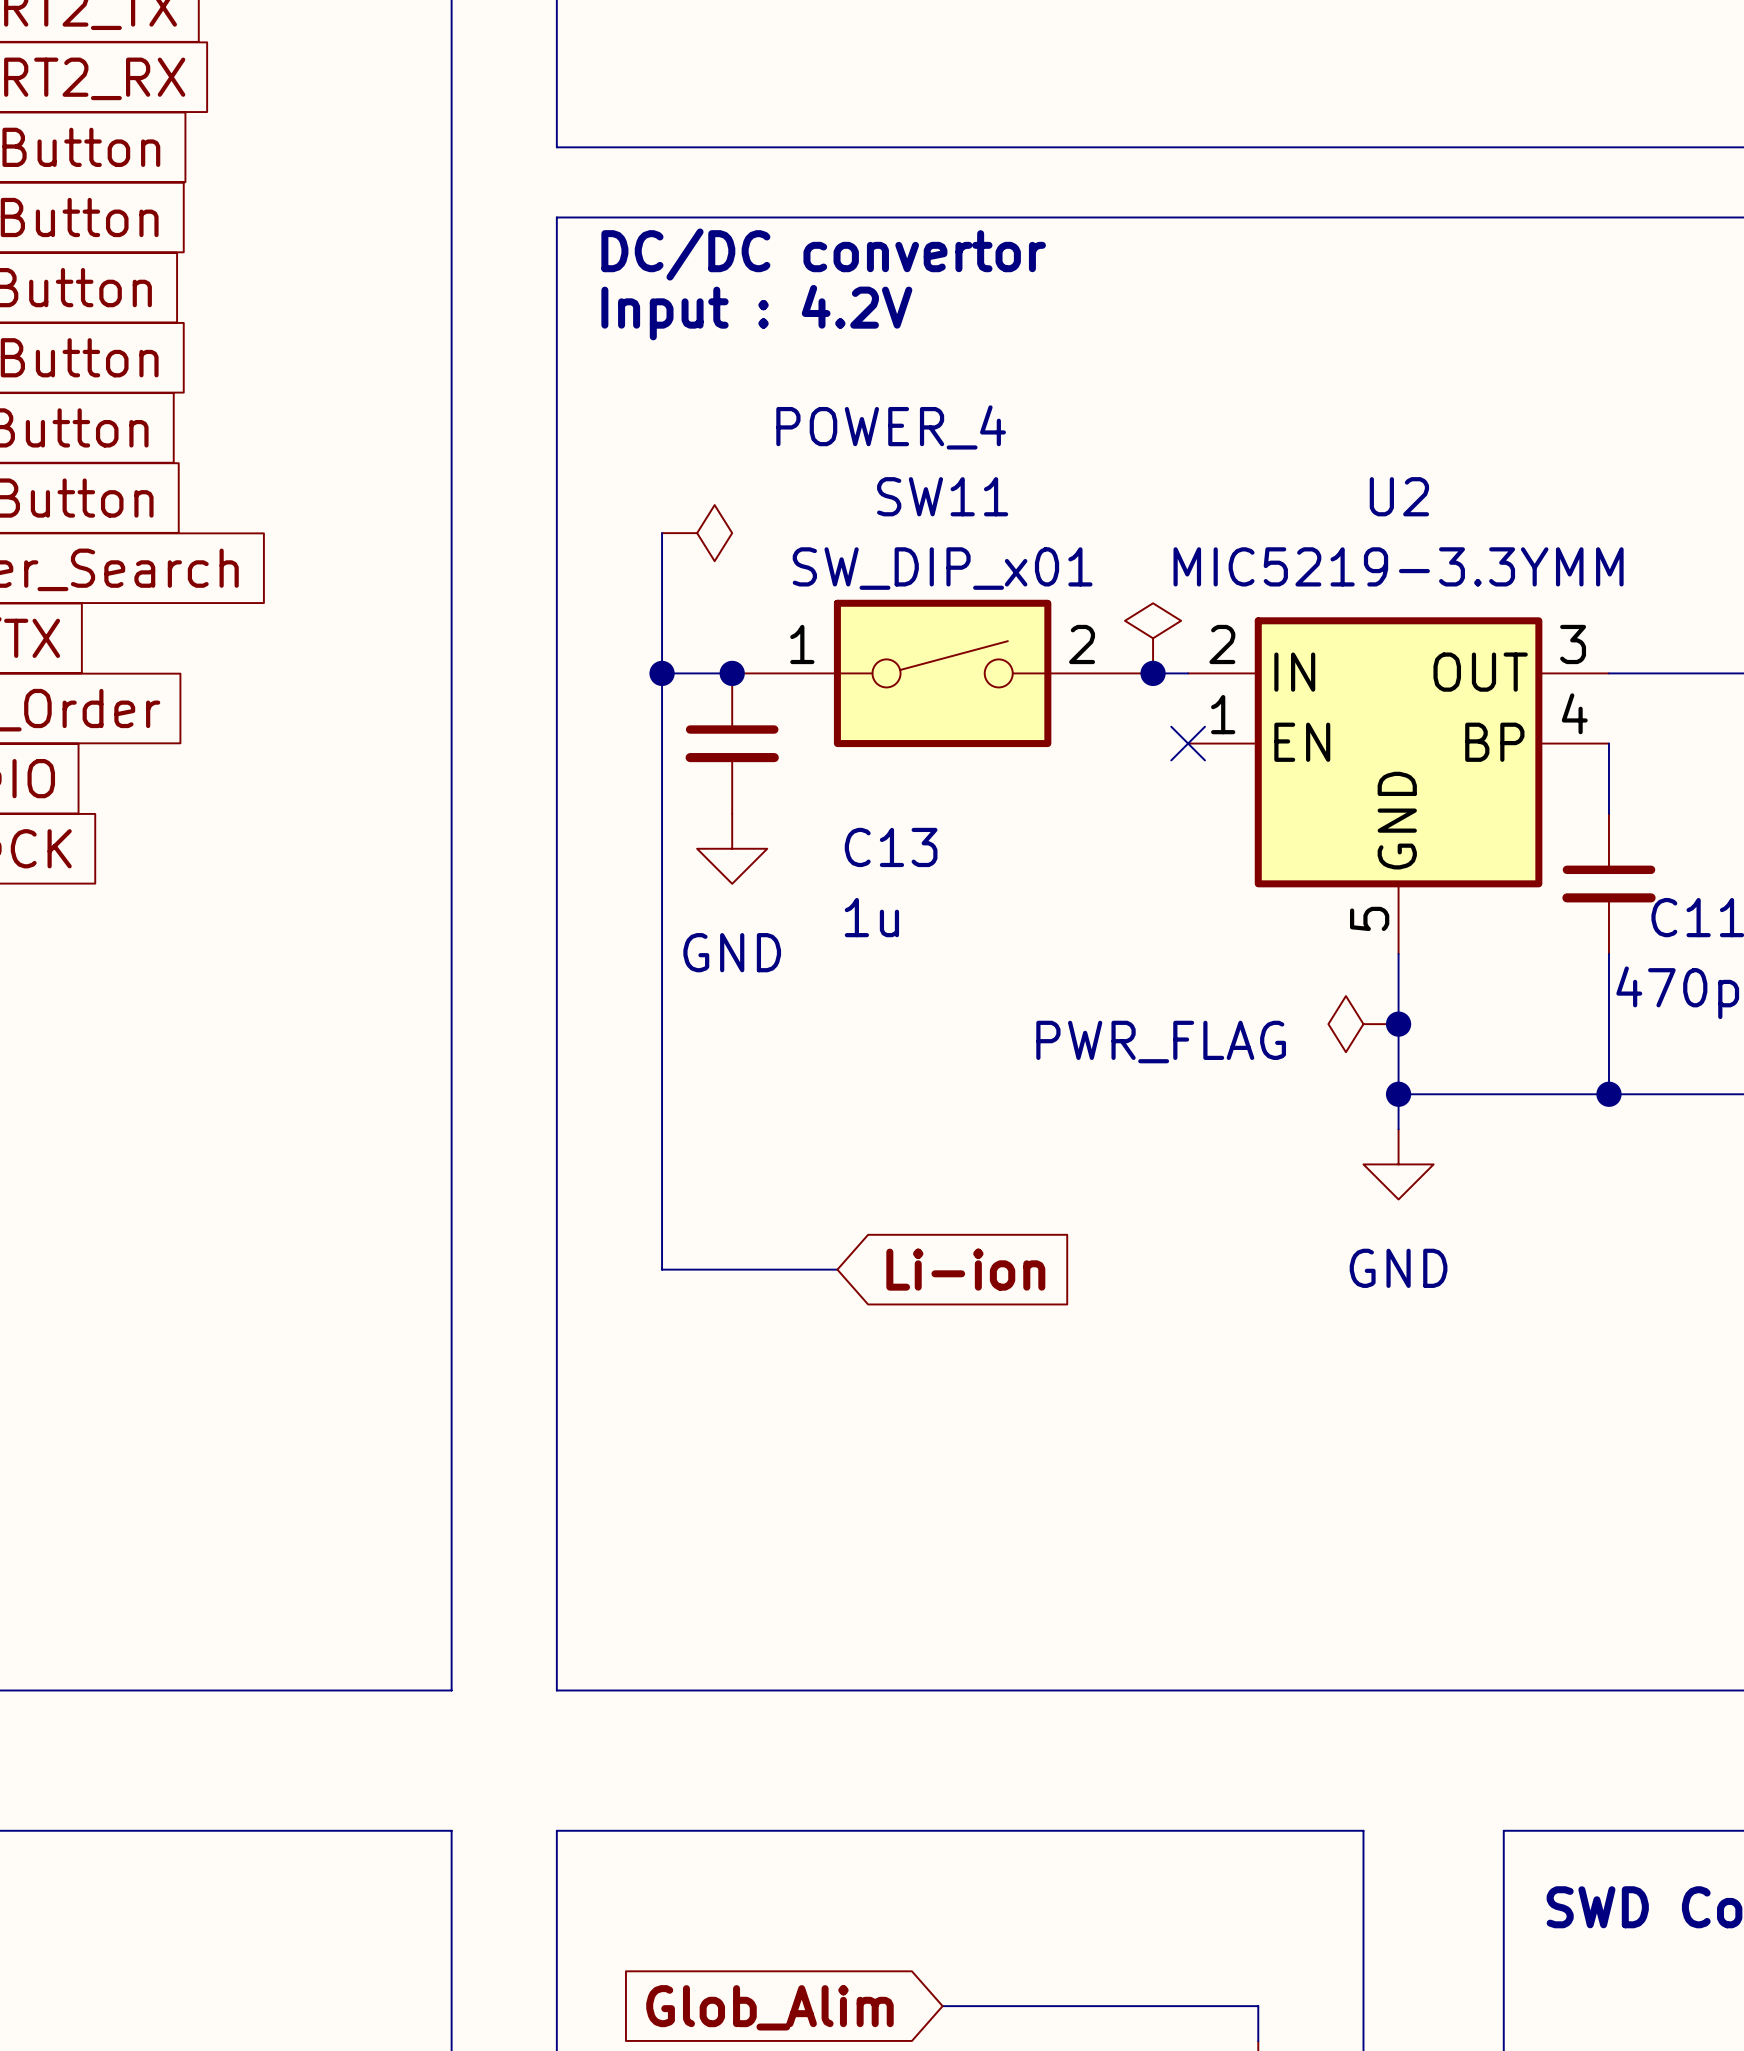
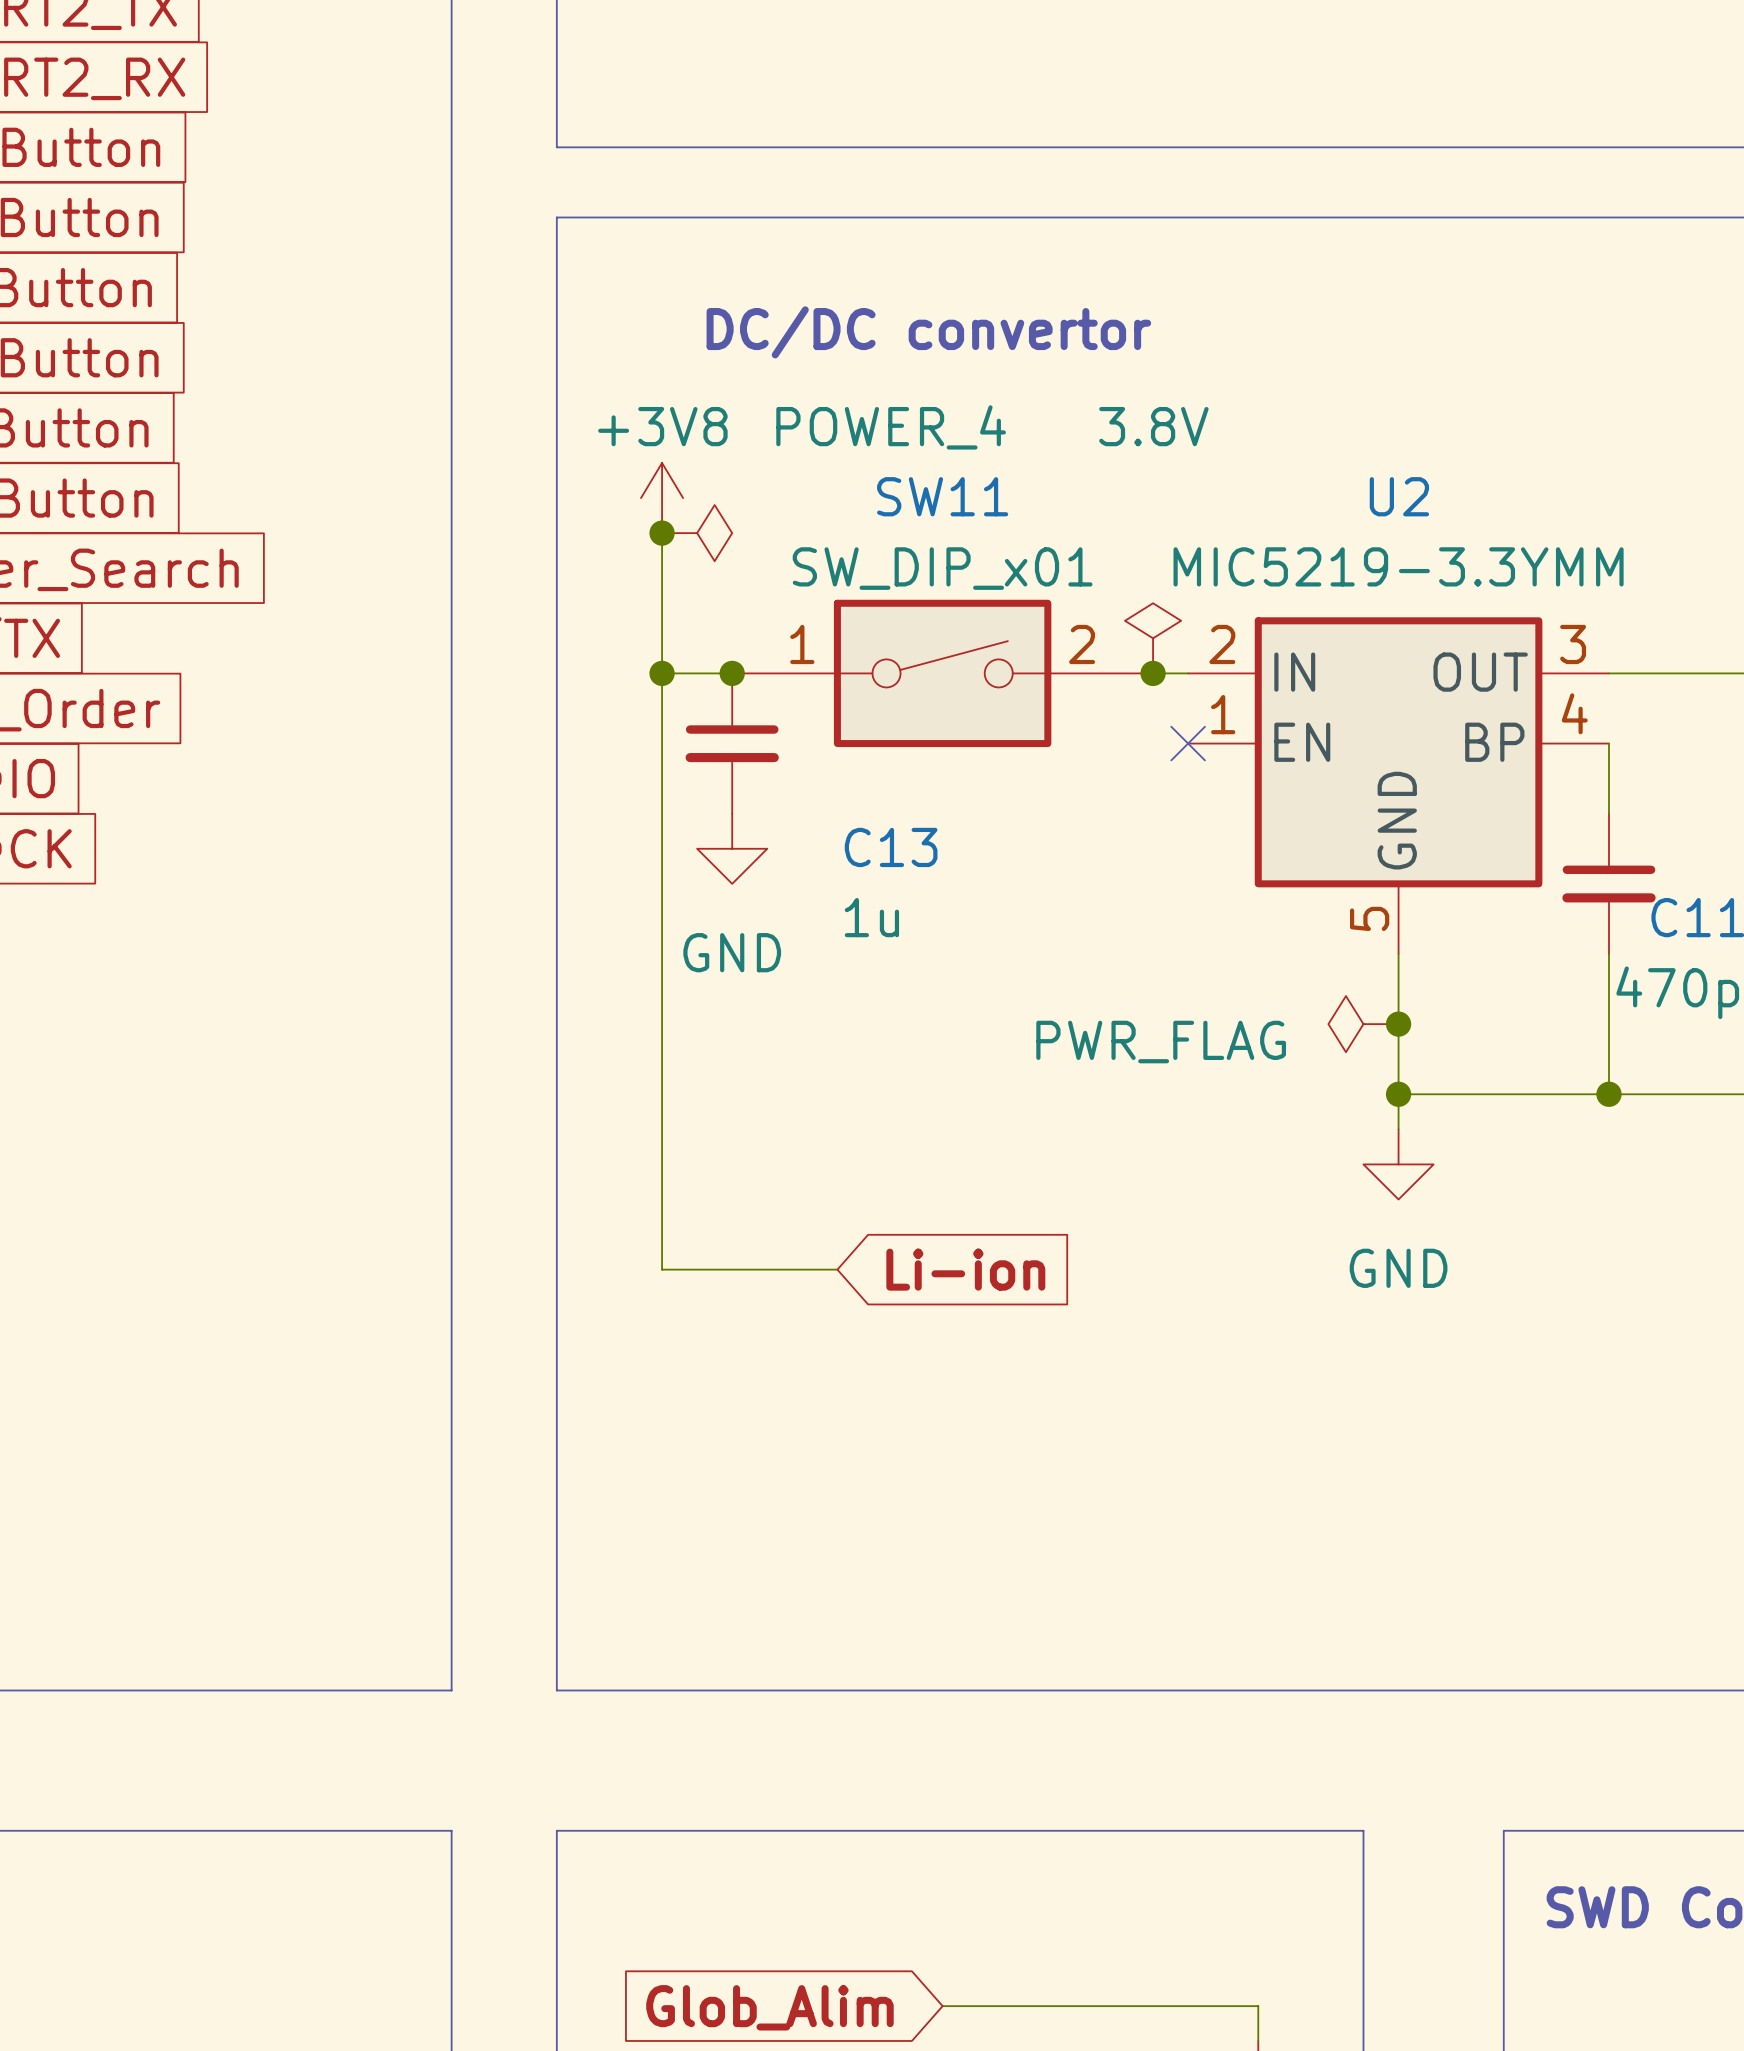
text position: DC/DC convertor (823, 254) -> DC/DC convertor (928, 332)
text: Input : 4.2V (756, 312) -> none
power symbol text: none -> 3.8V (1153, 426)
power symbol: none -> +3V8 (662, 498)
junction: none -> (662, 533)

